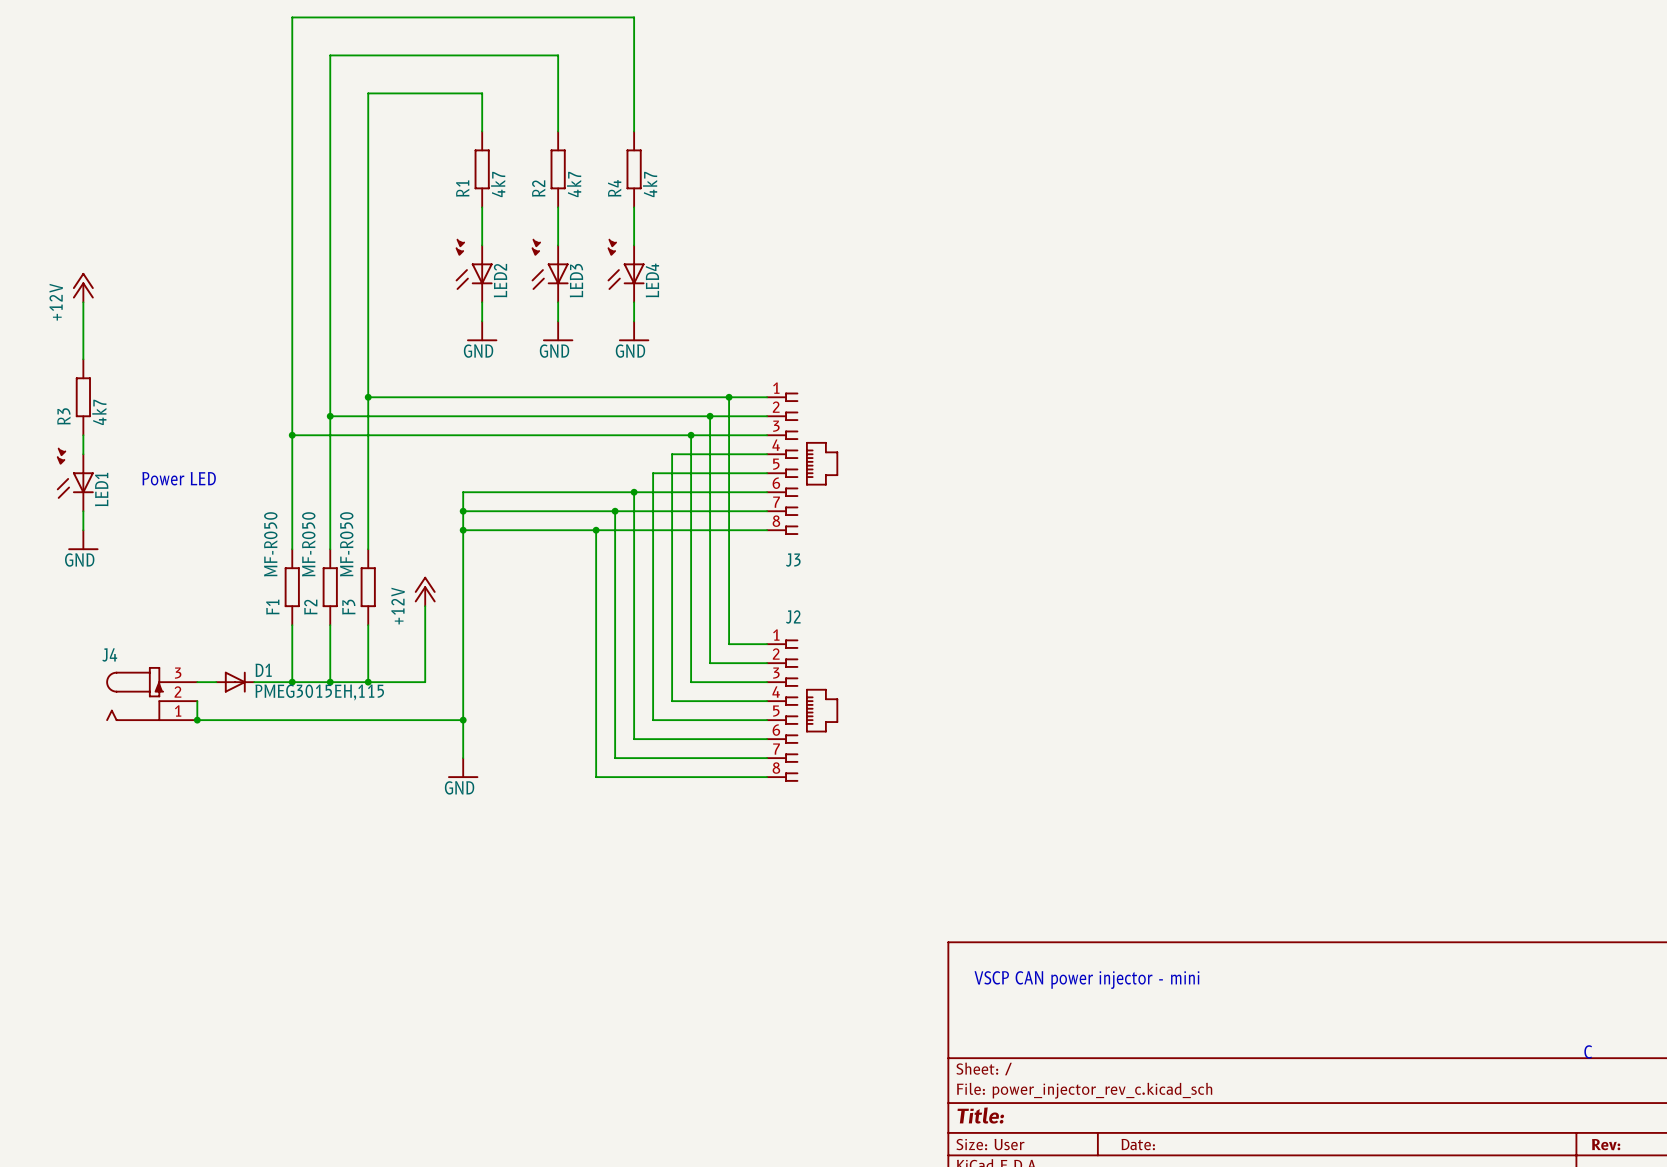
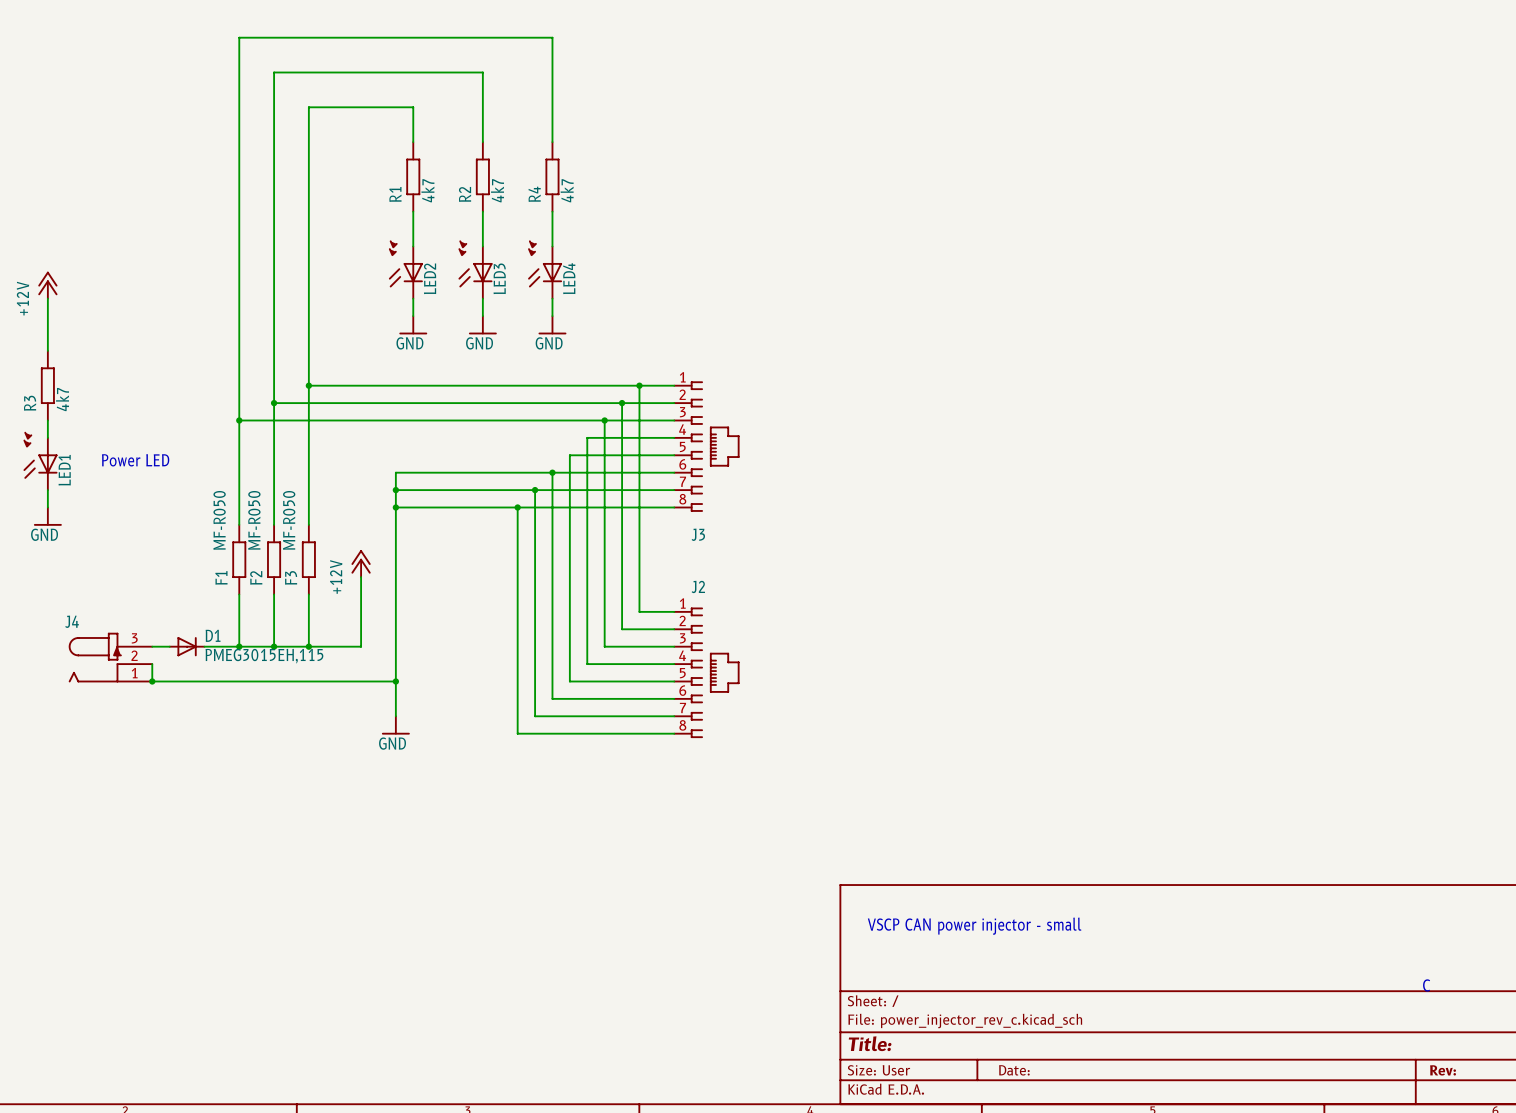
text: VSCP CAN power injector - mini (1086, 980) -> VSCP CAN power injector - small (974, 926)

